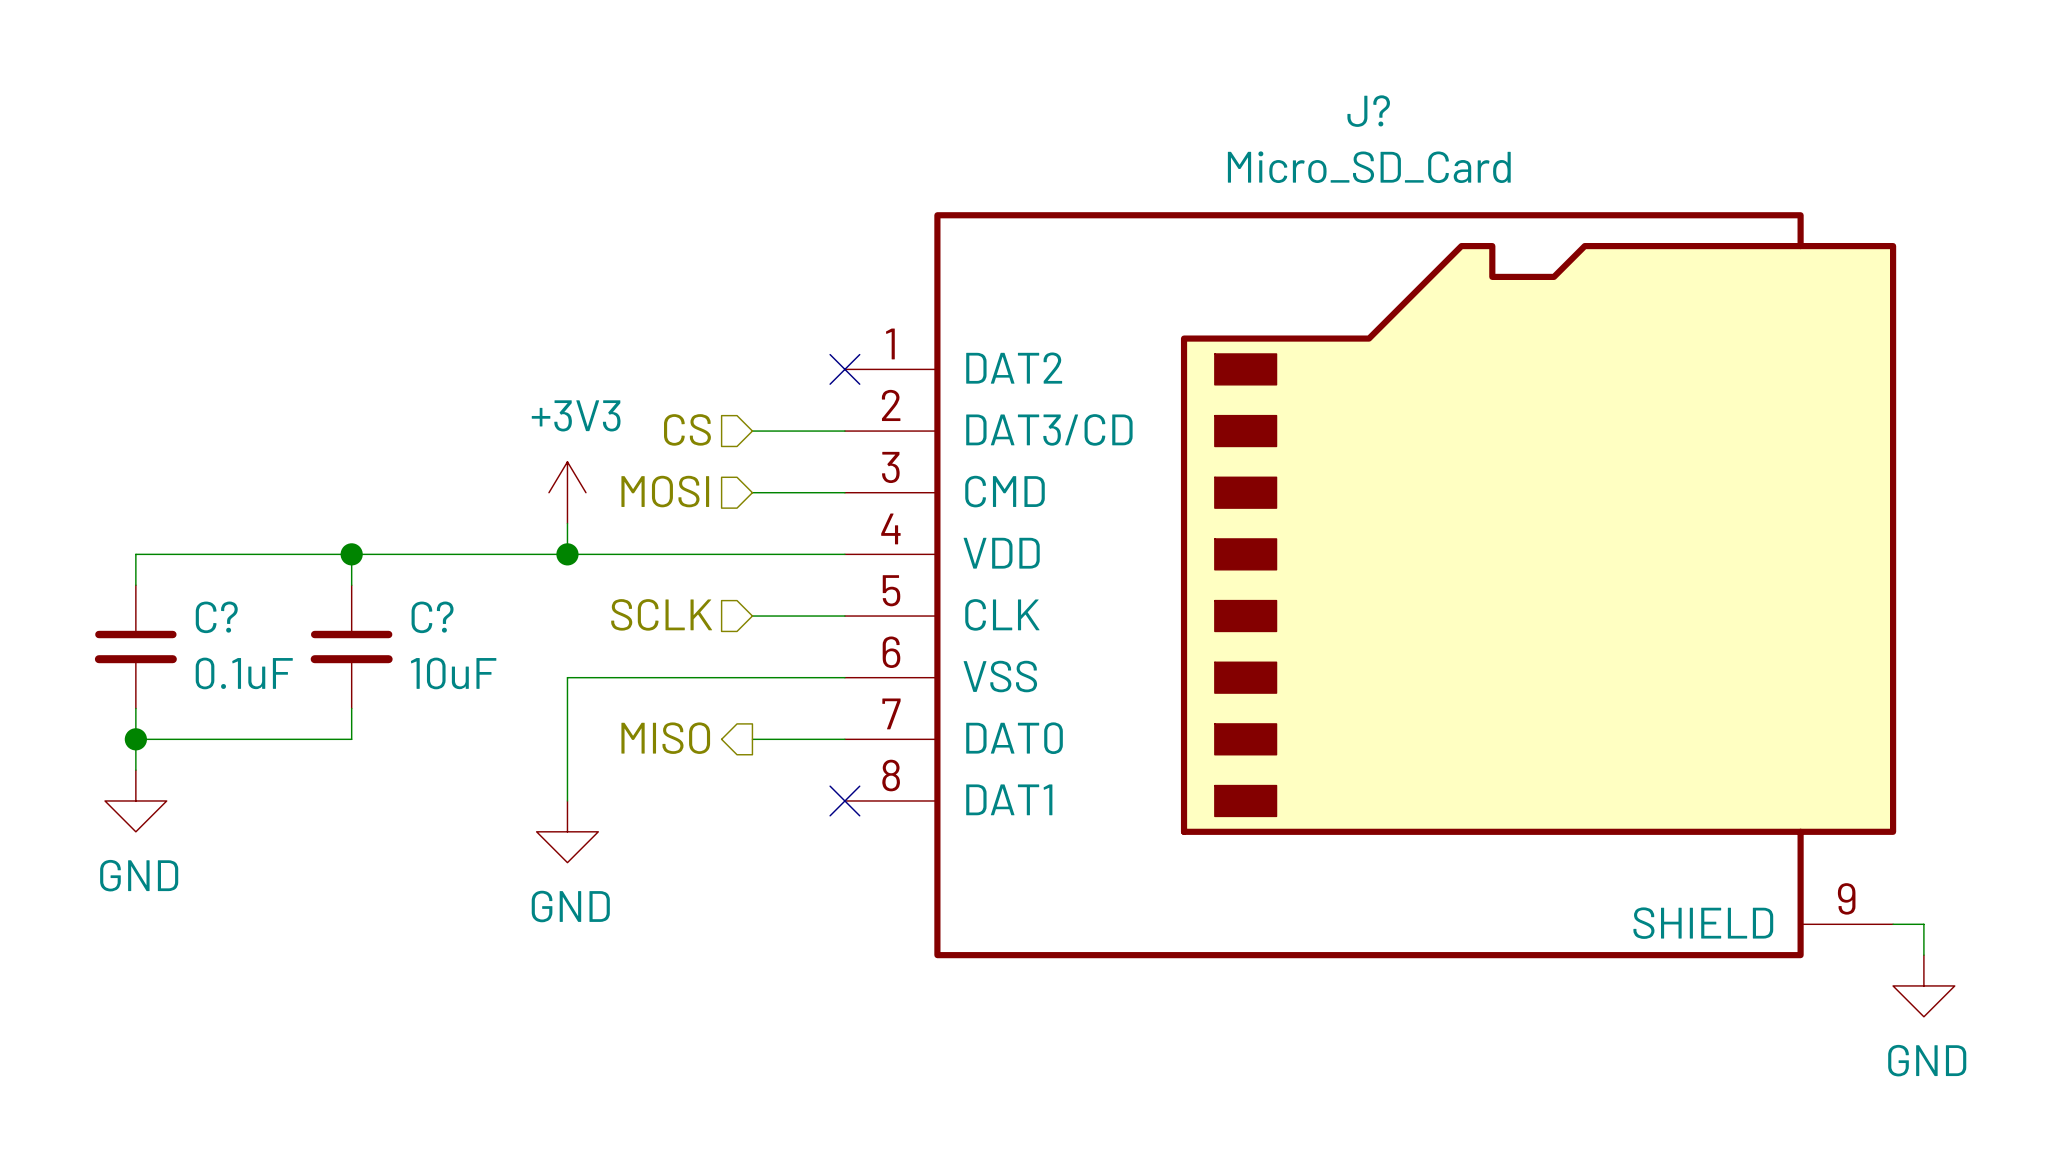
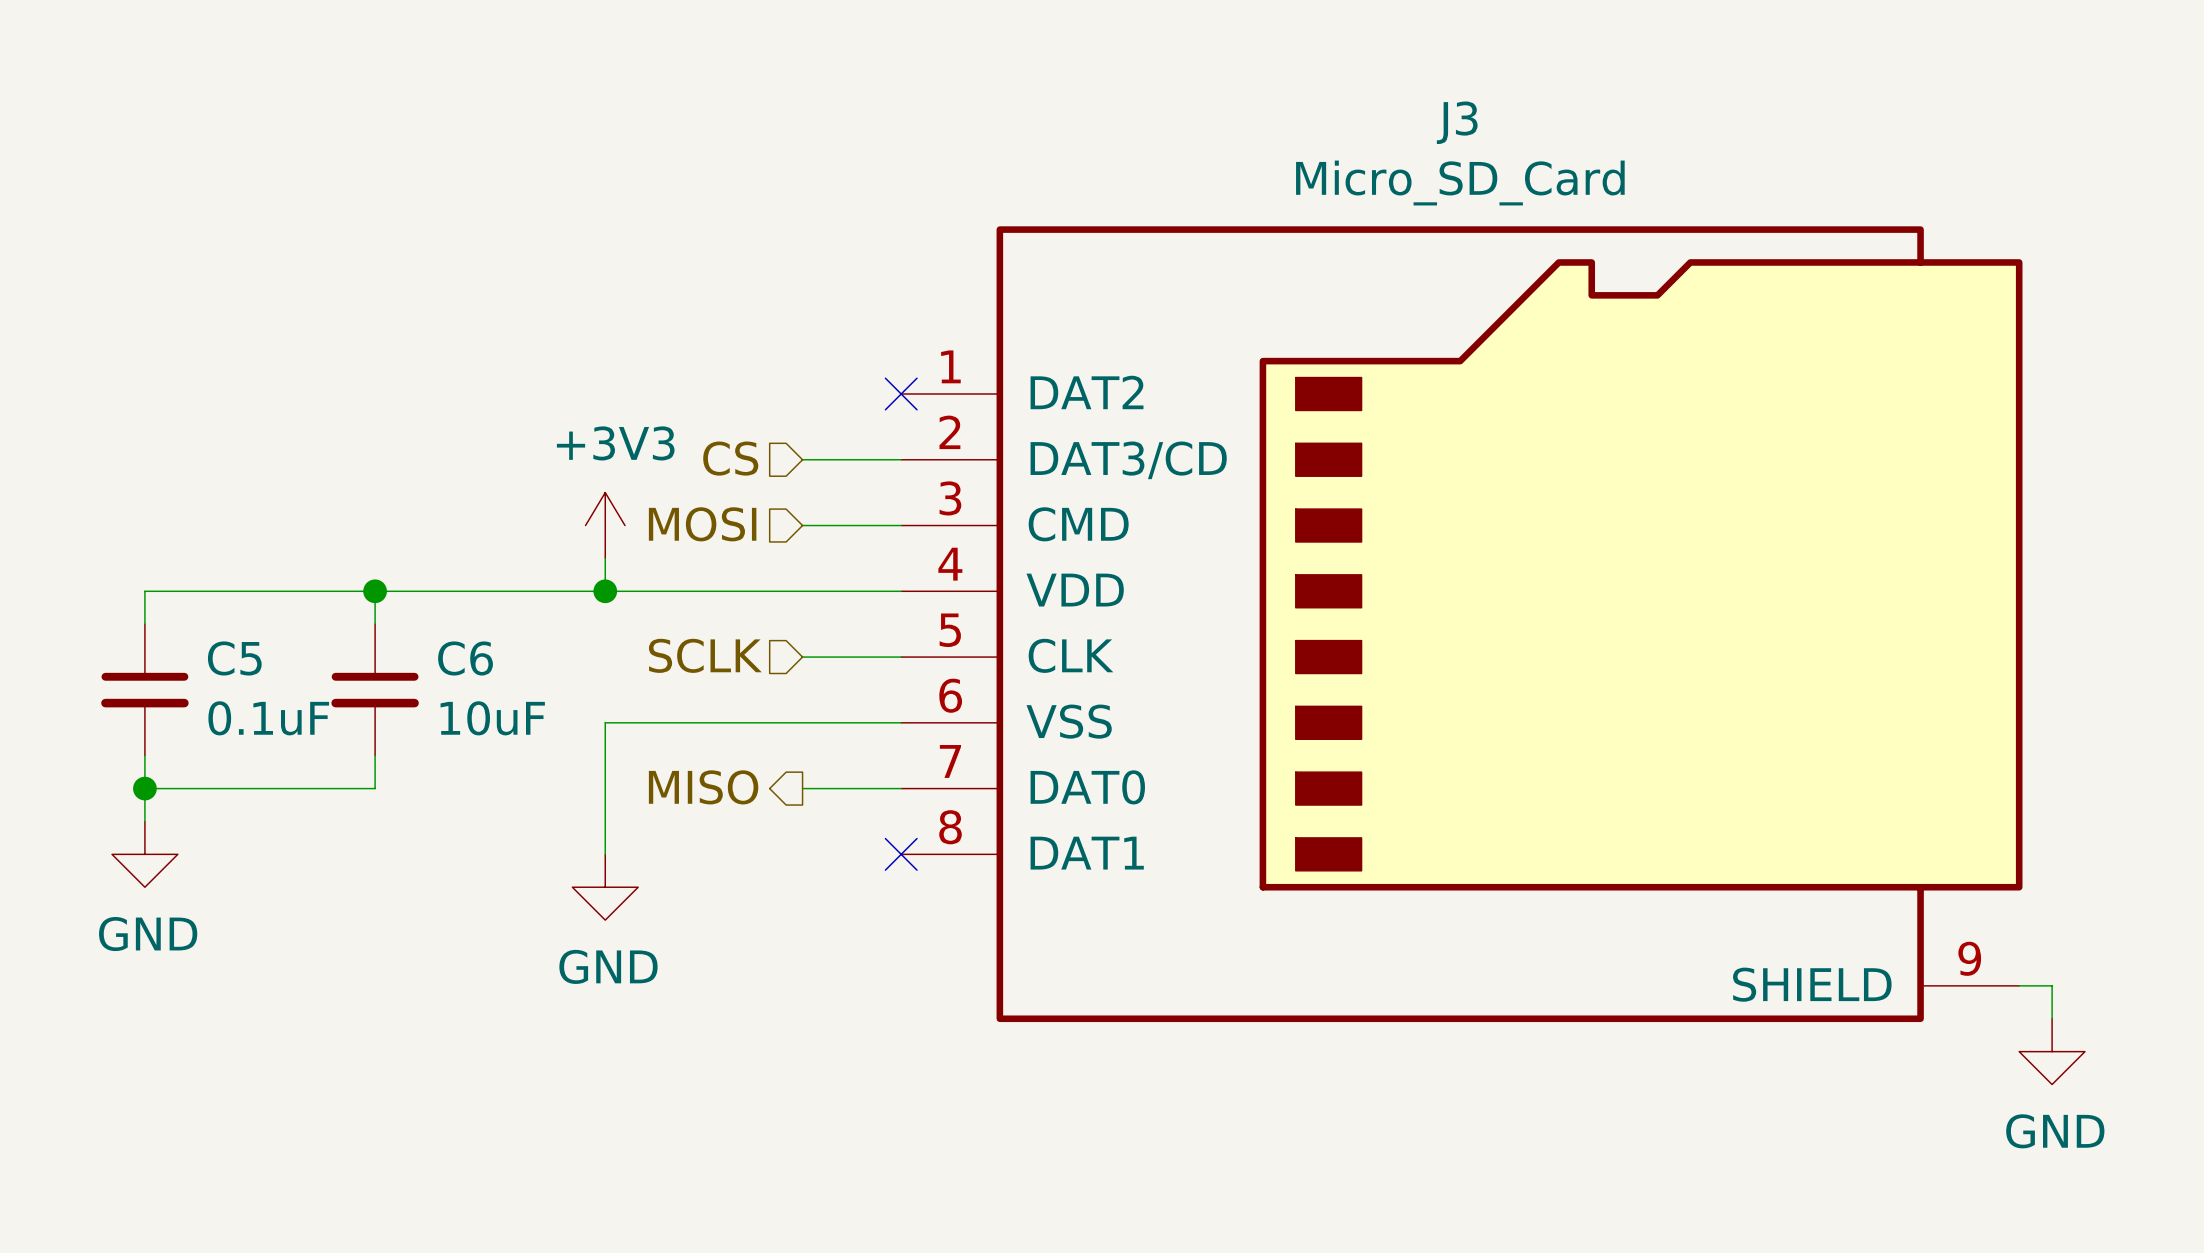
J? name: J? (1368, 111) -> J3 (1457, 122)
C? name: C? (216, 617) -> C5 (234, 658)
C? name: C? (432, 617) -> C6 (465, 658)

